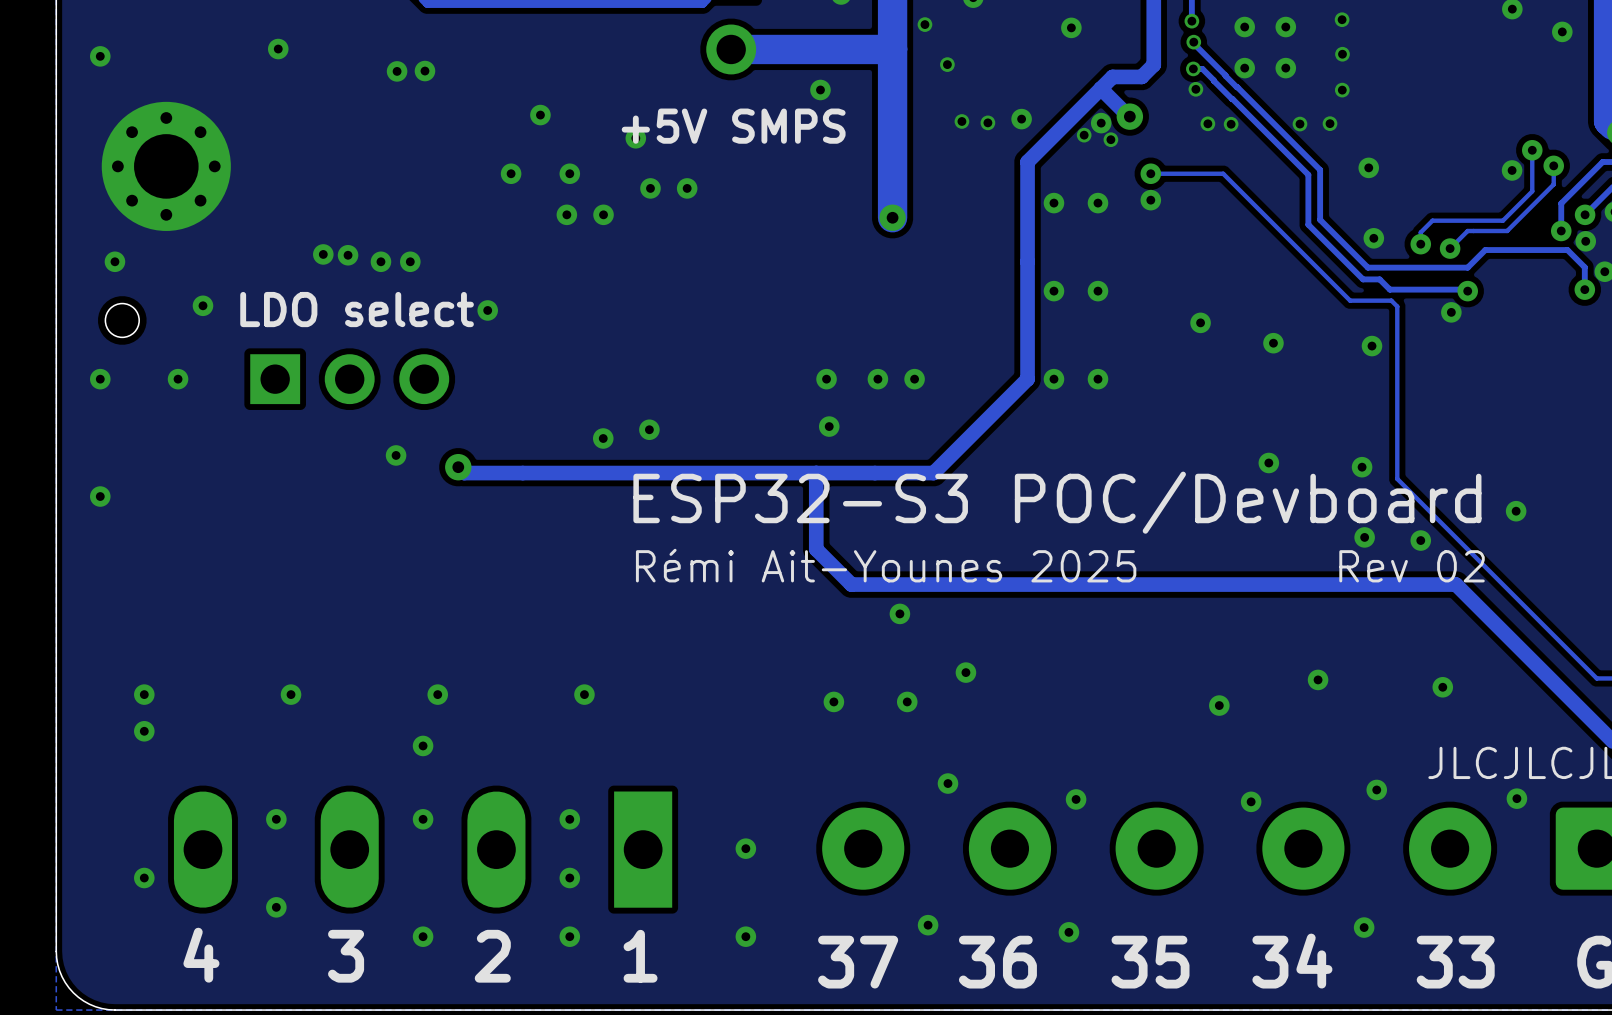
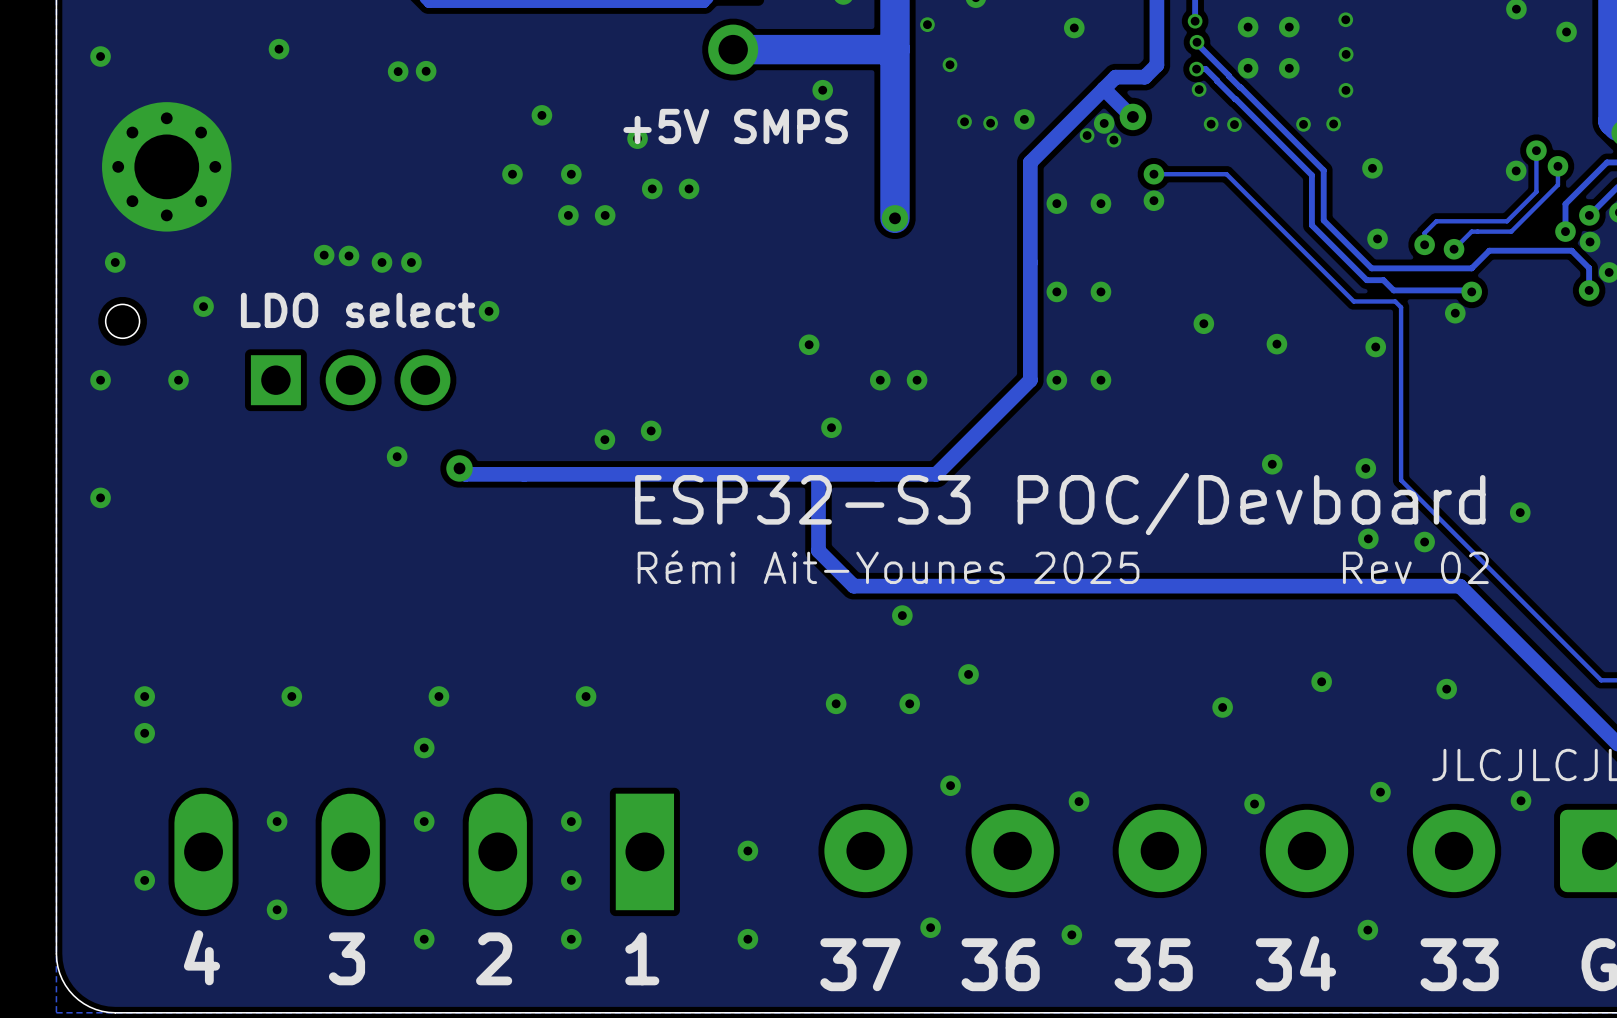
via position: (826, 379) -> (809, 344)

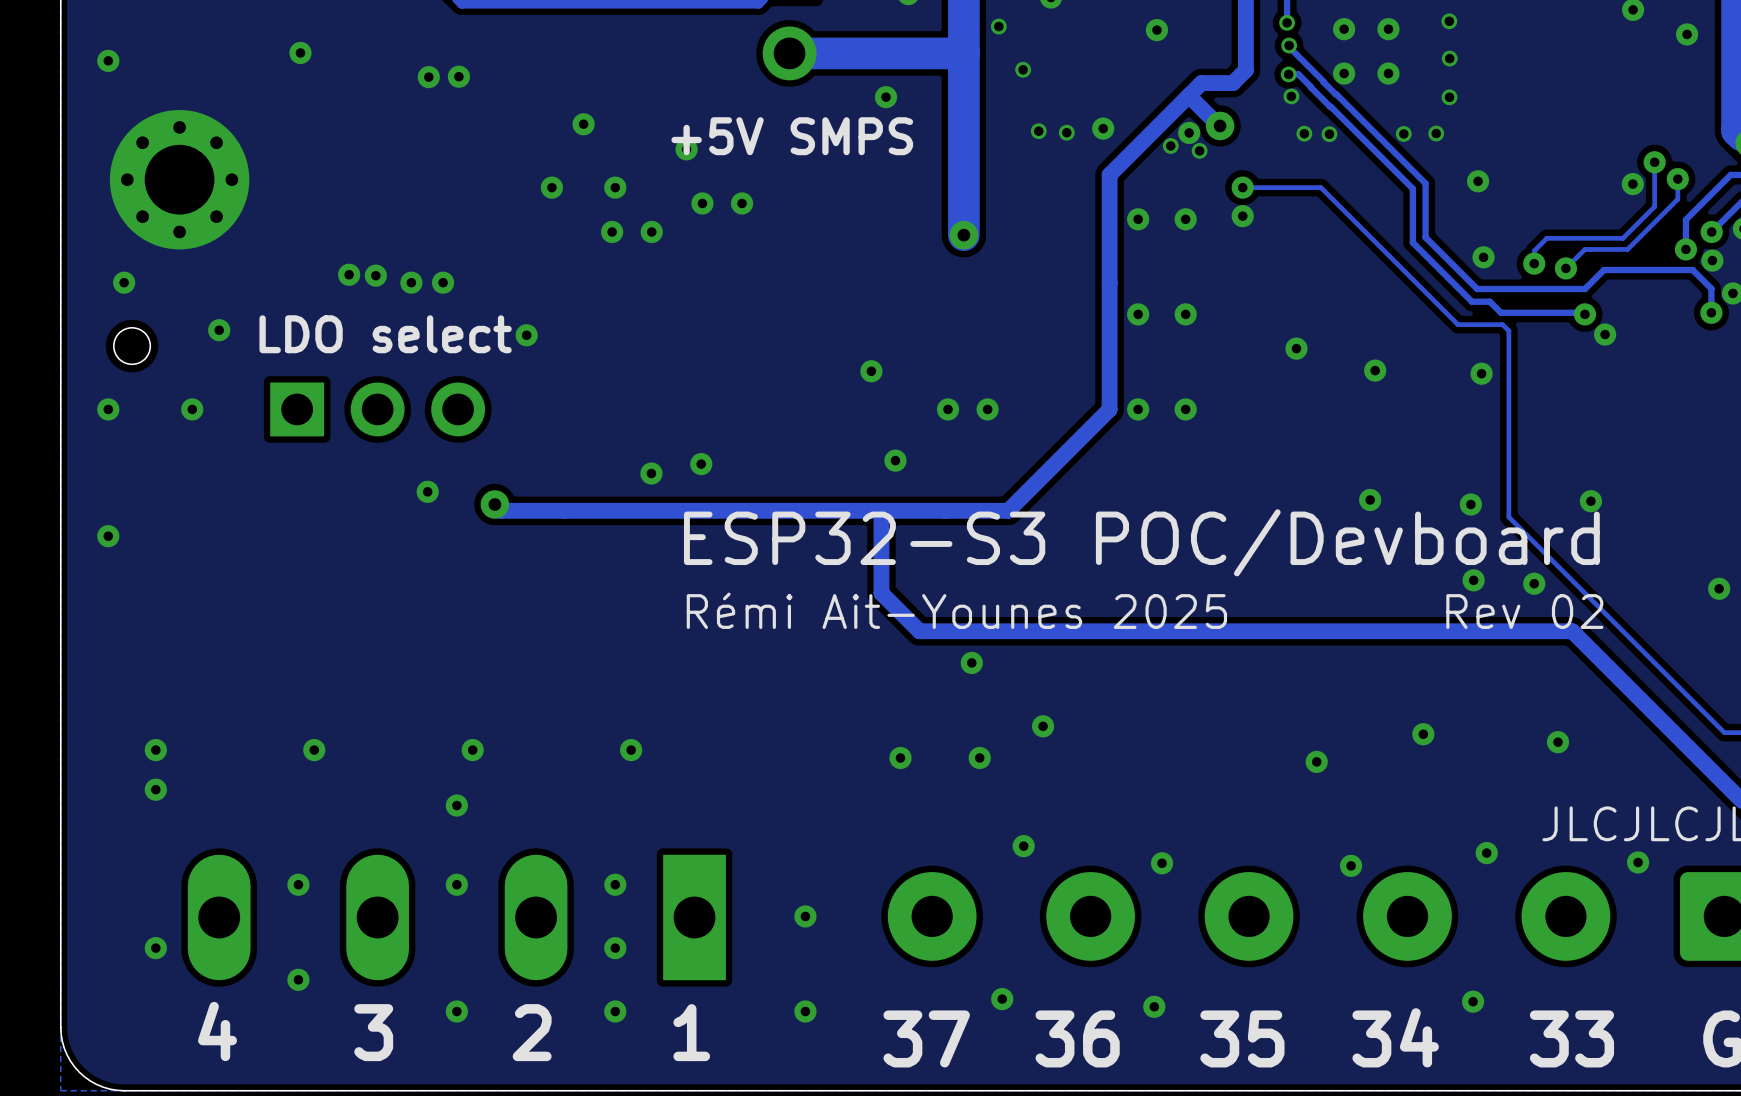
via position: (1455, 313) -> (1605, 334)
via: none -> (1590, 501)
via: (1520, 512) -> none
via: none -> (1719, 588)

